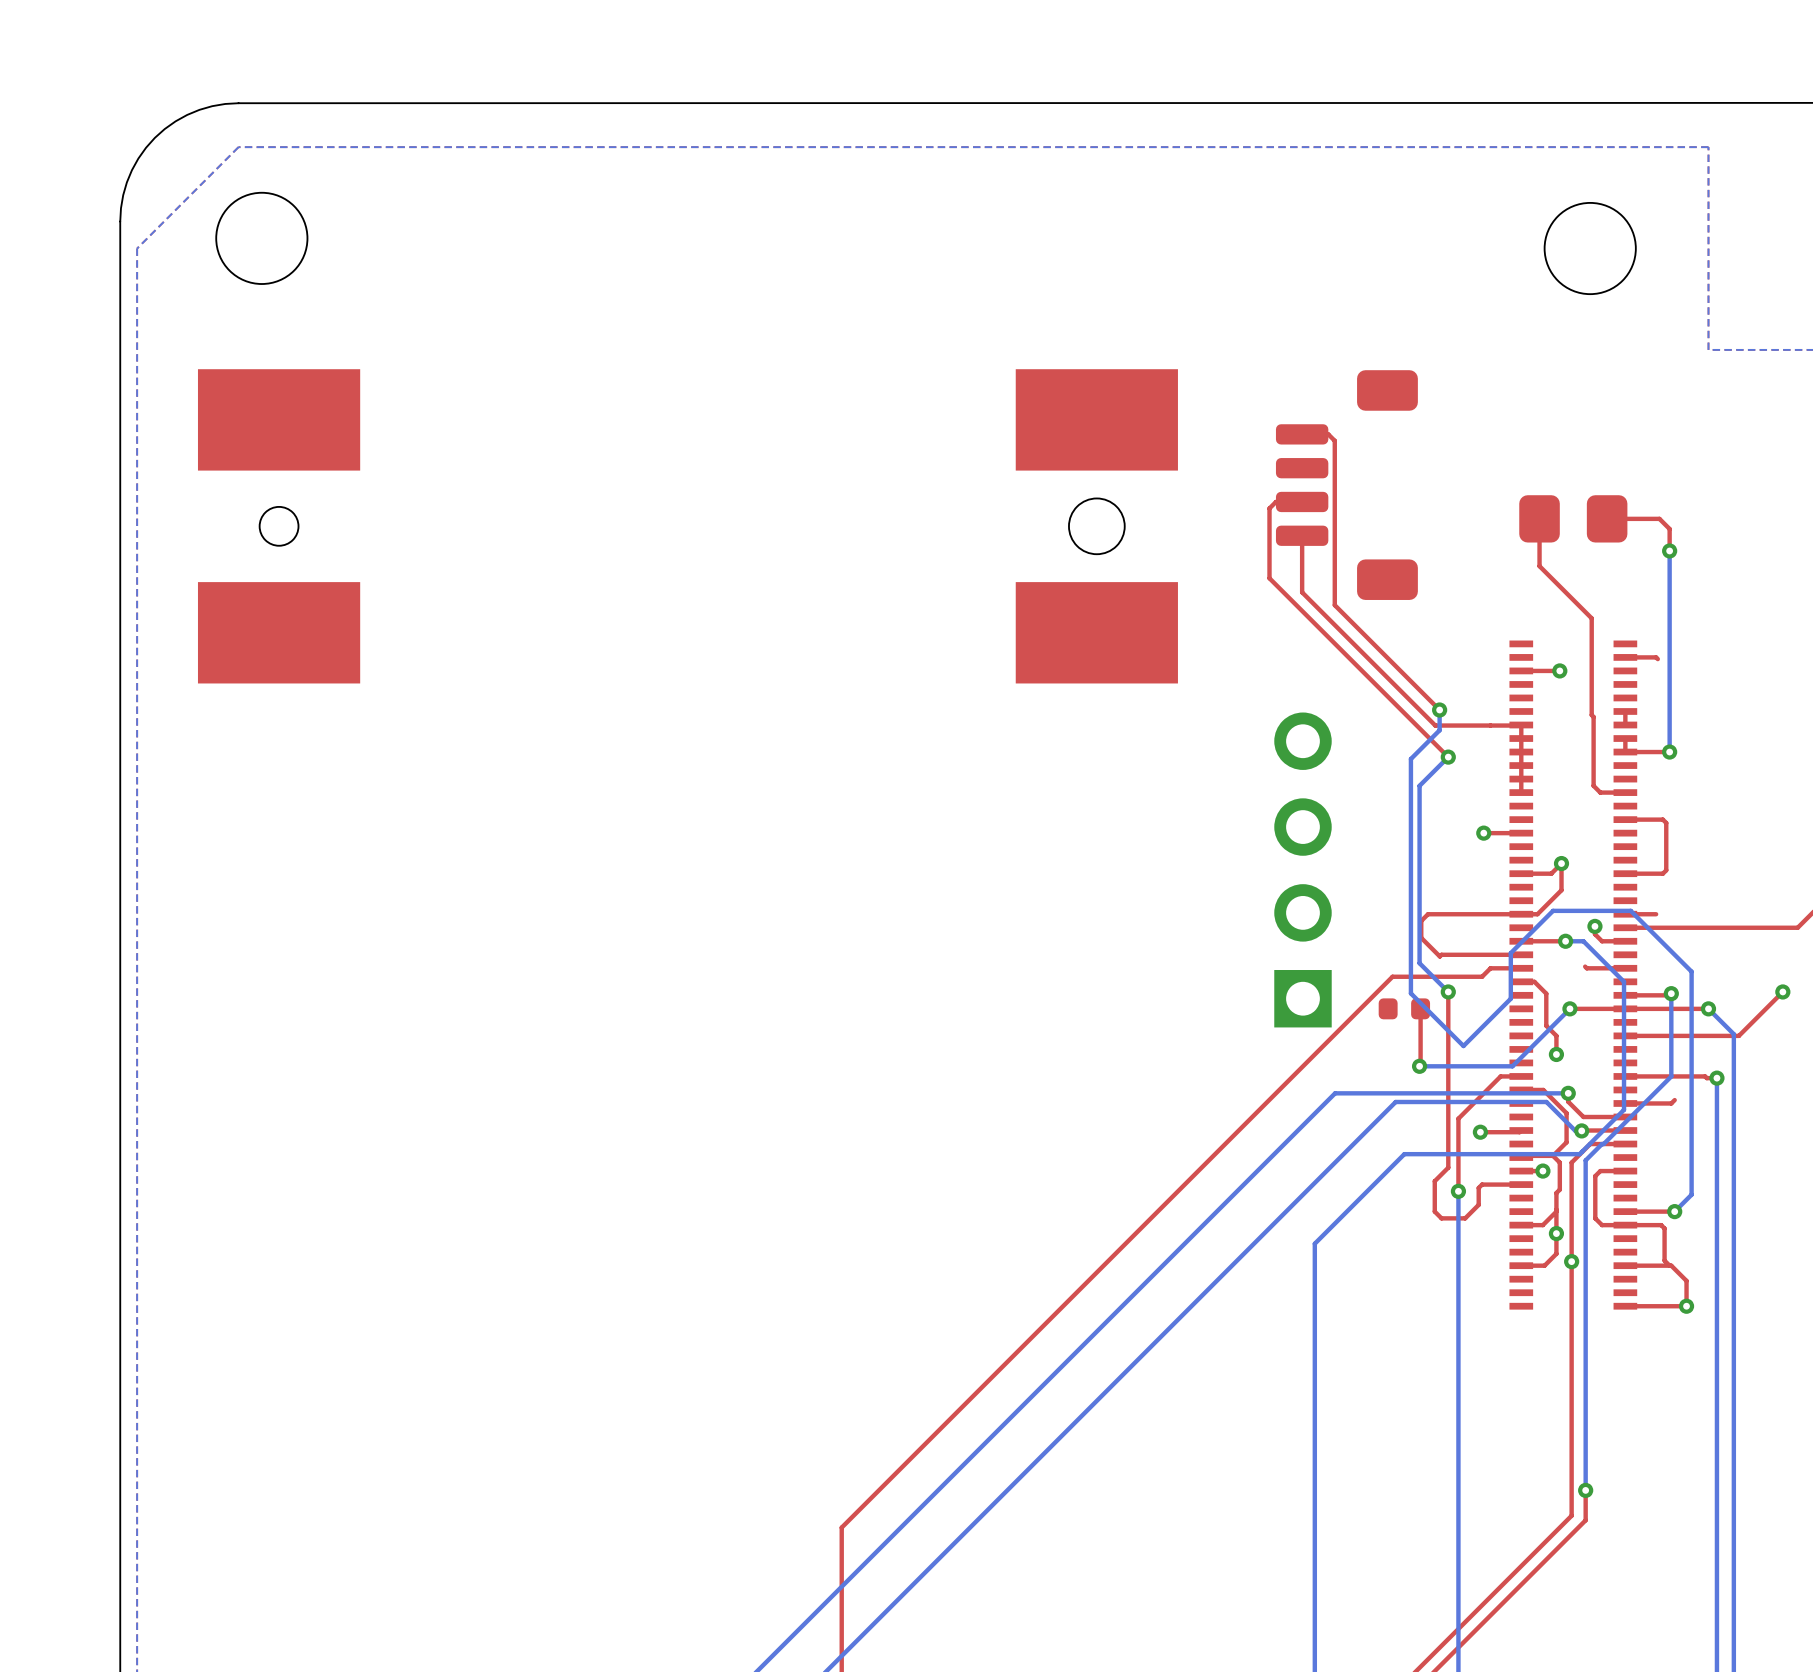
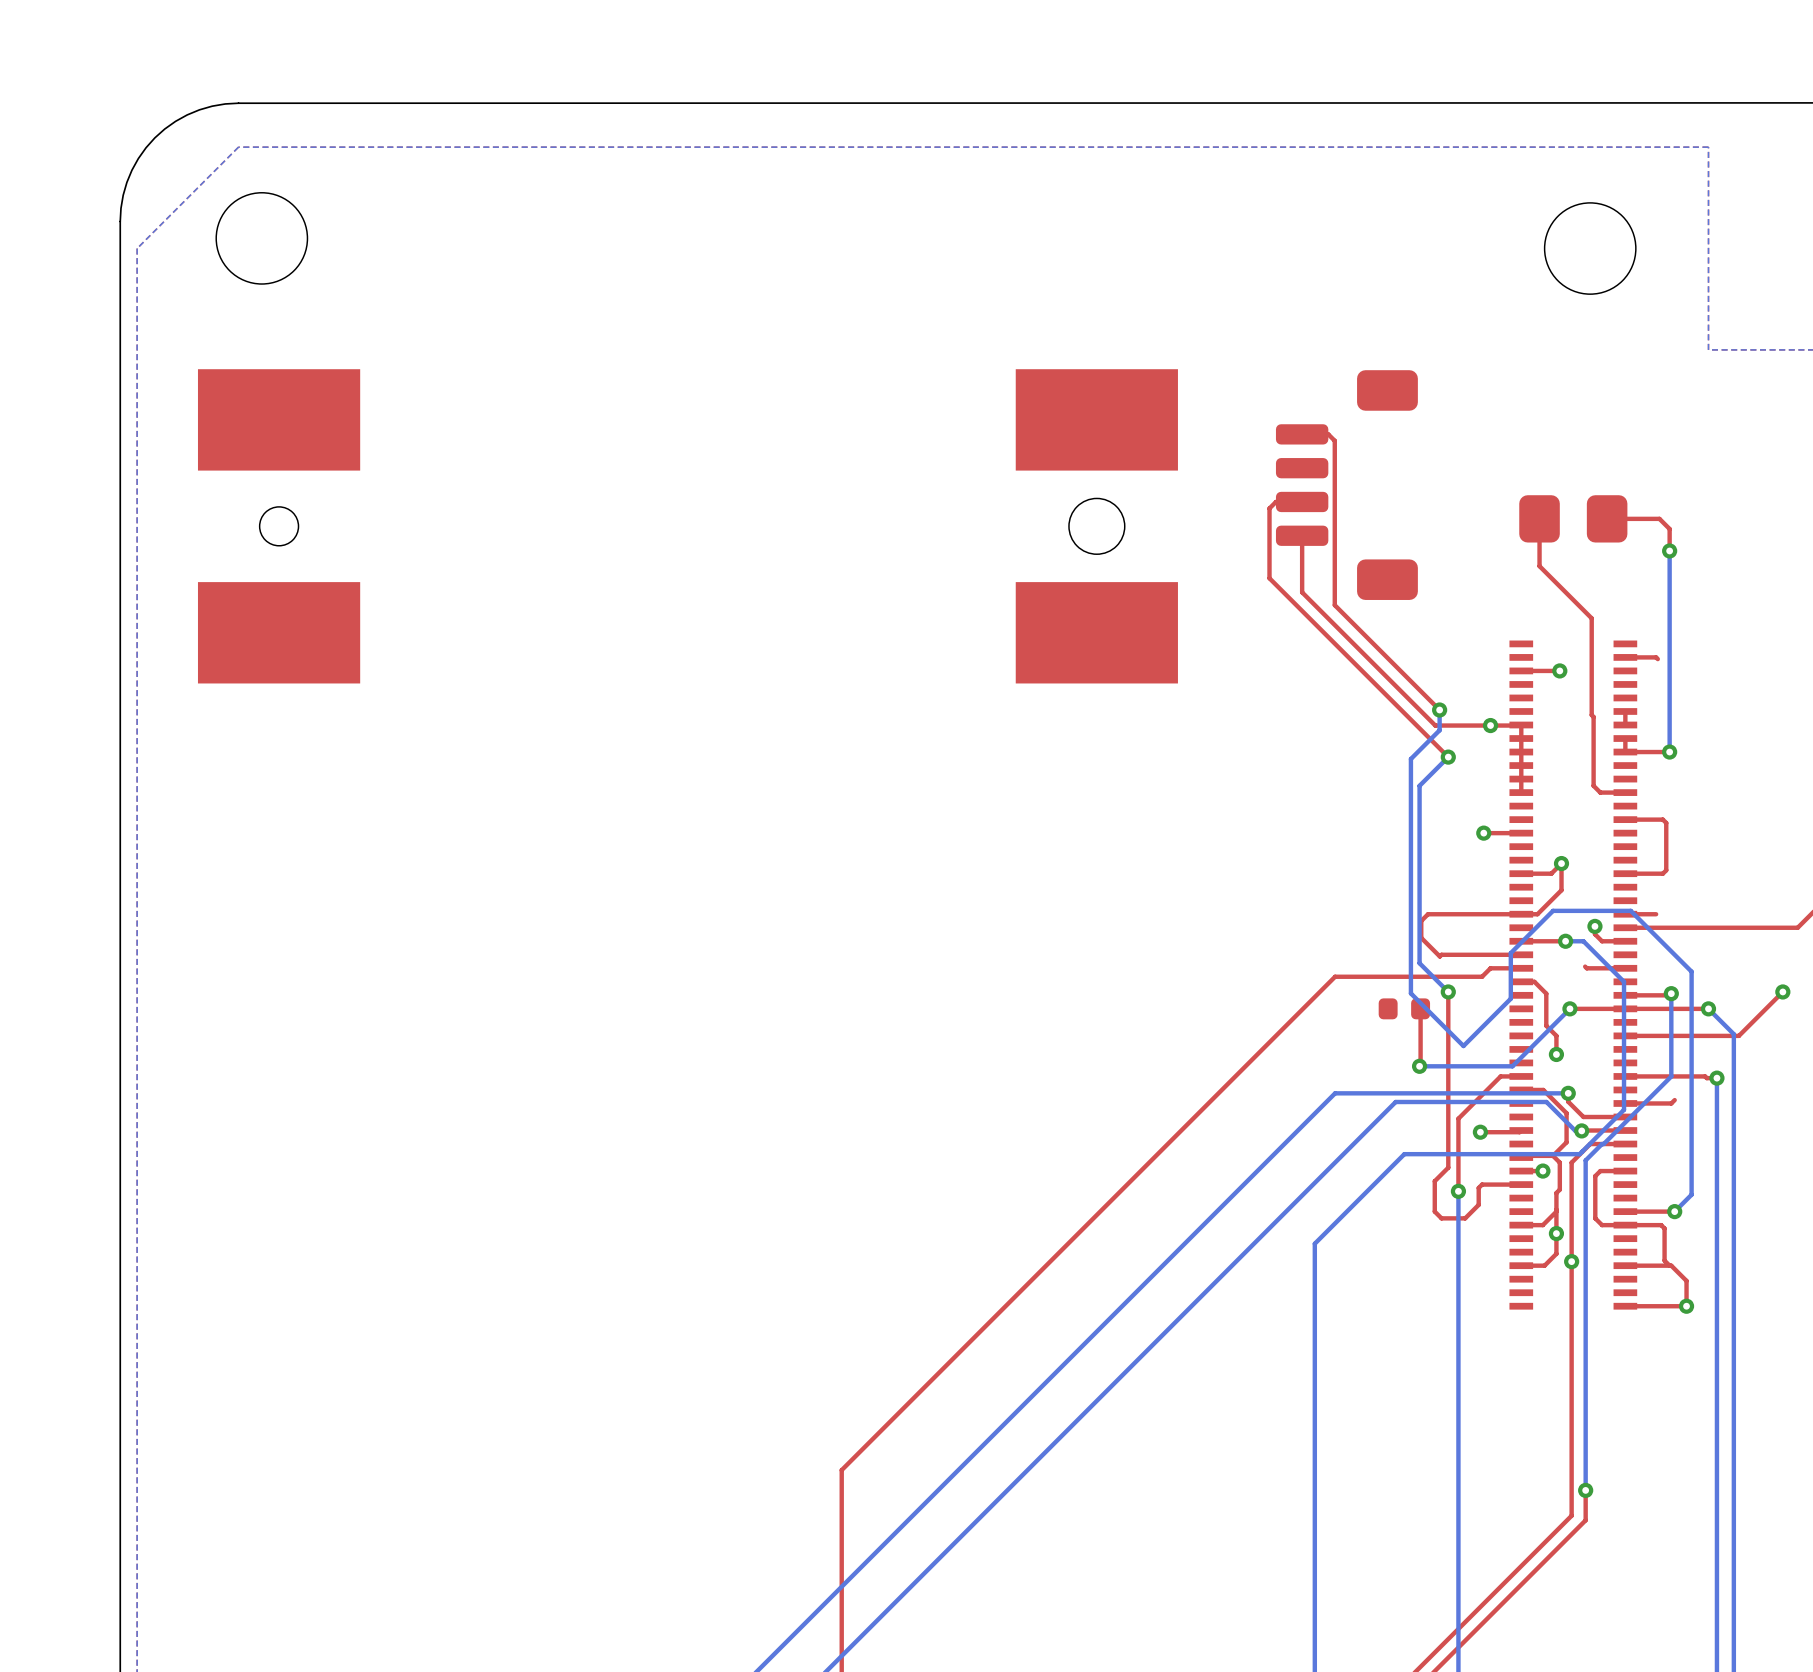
via: none -> (1490, 725)
part: (1302, 869) -> none
top track: (1392, 976) (841, 1527) -> (1392, 976) (1335, 976) (841, 1470) (841, 1527)

